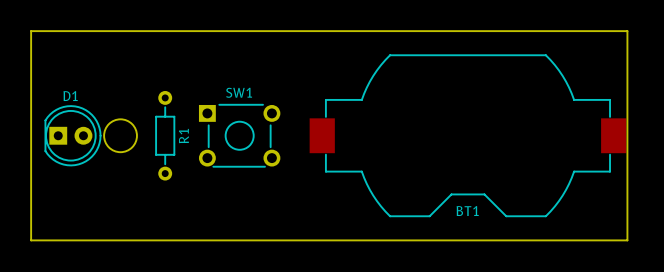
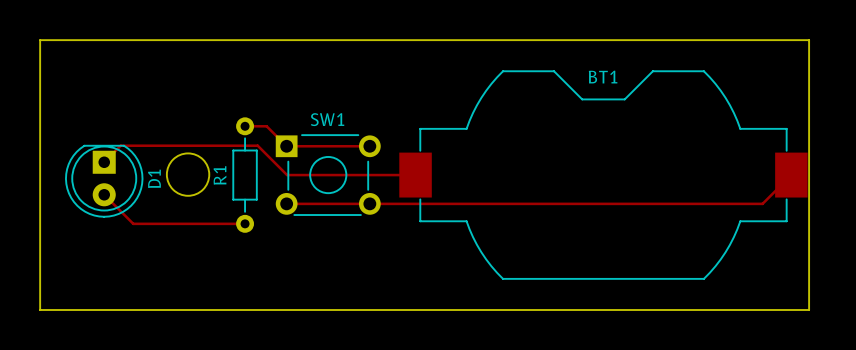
track: none -> (245, 126) (266, 126) (286, 146) (369, 146)
track: none -> (104, 162) (120, 145) (257, 145) (287, 175) (415, 175)
D1 rotation: 0° (72, 135) -> 90° clockwise (104, 181)
round board edge position: (120, 135) -> (188, 174)
R1 position: (165, 135) -> (245, 175)
SW1 position: (239, 135) -> (328, 175)
BT1 rotation: 0° (467, 135) -> 180° (603, 175)
track: none -> (791, 175) (762, 203) (286, 203)
R1 name position: R1 (183, 136) -> R1 (219, 175)
track: none -> (104, 194) (133, 223) (245, 223)

